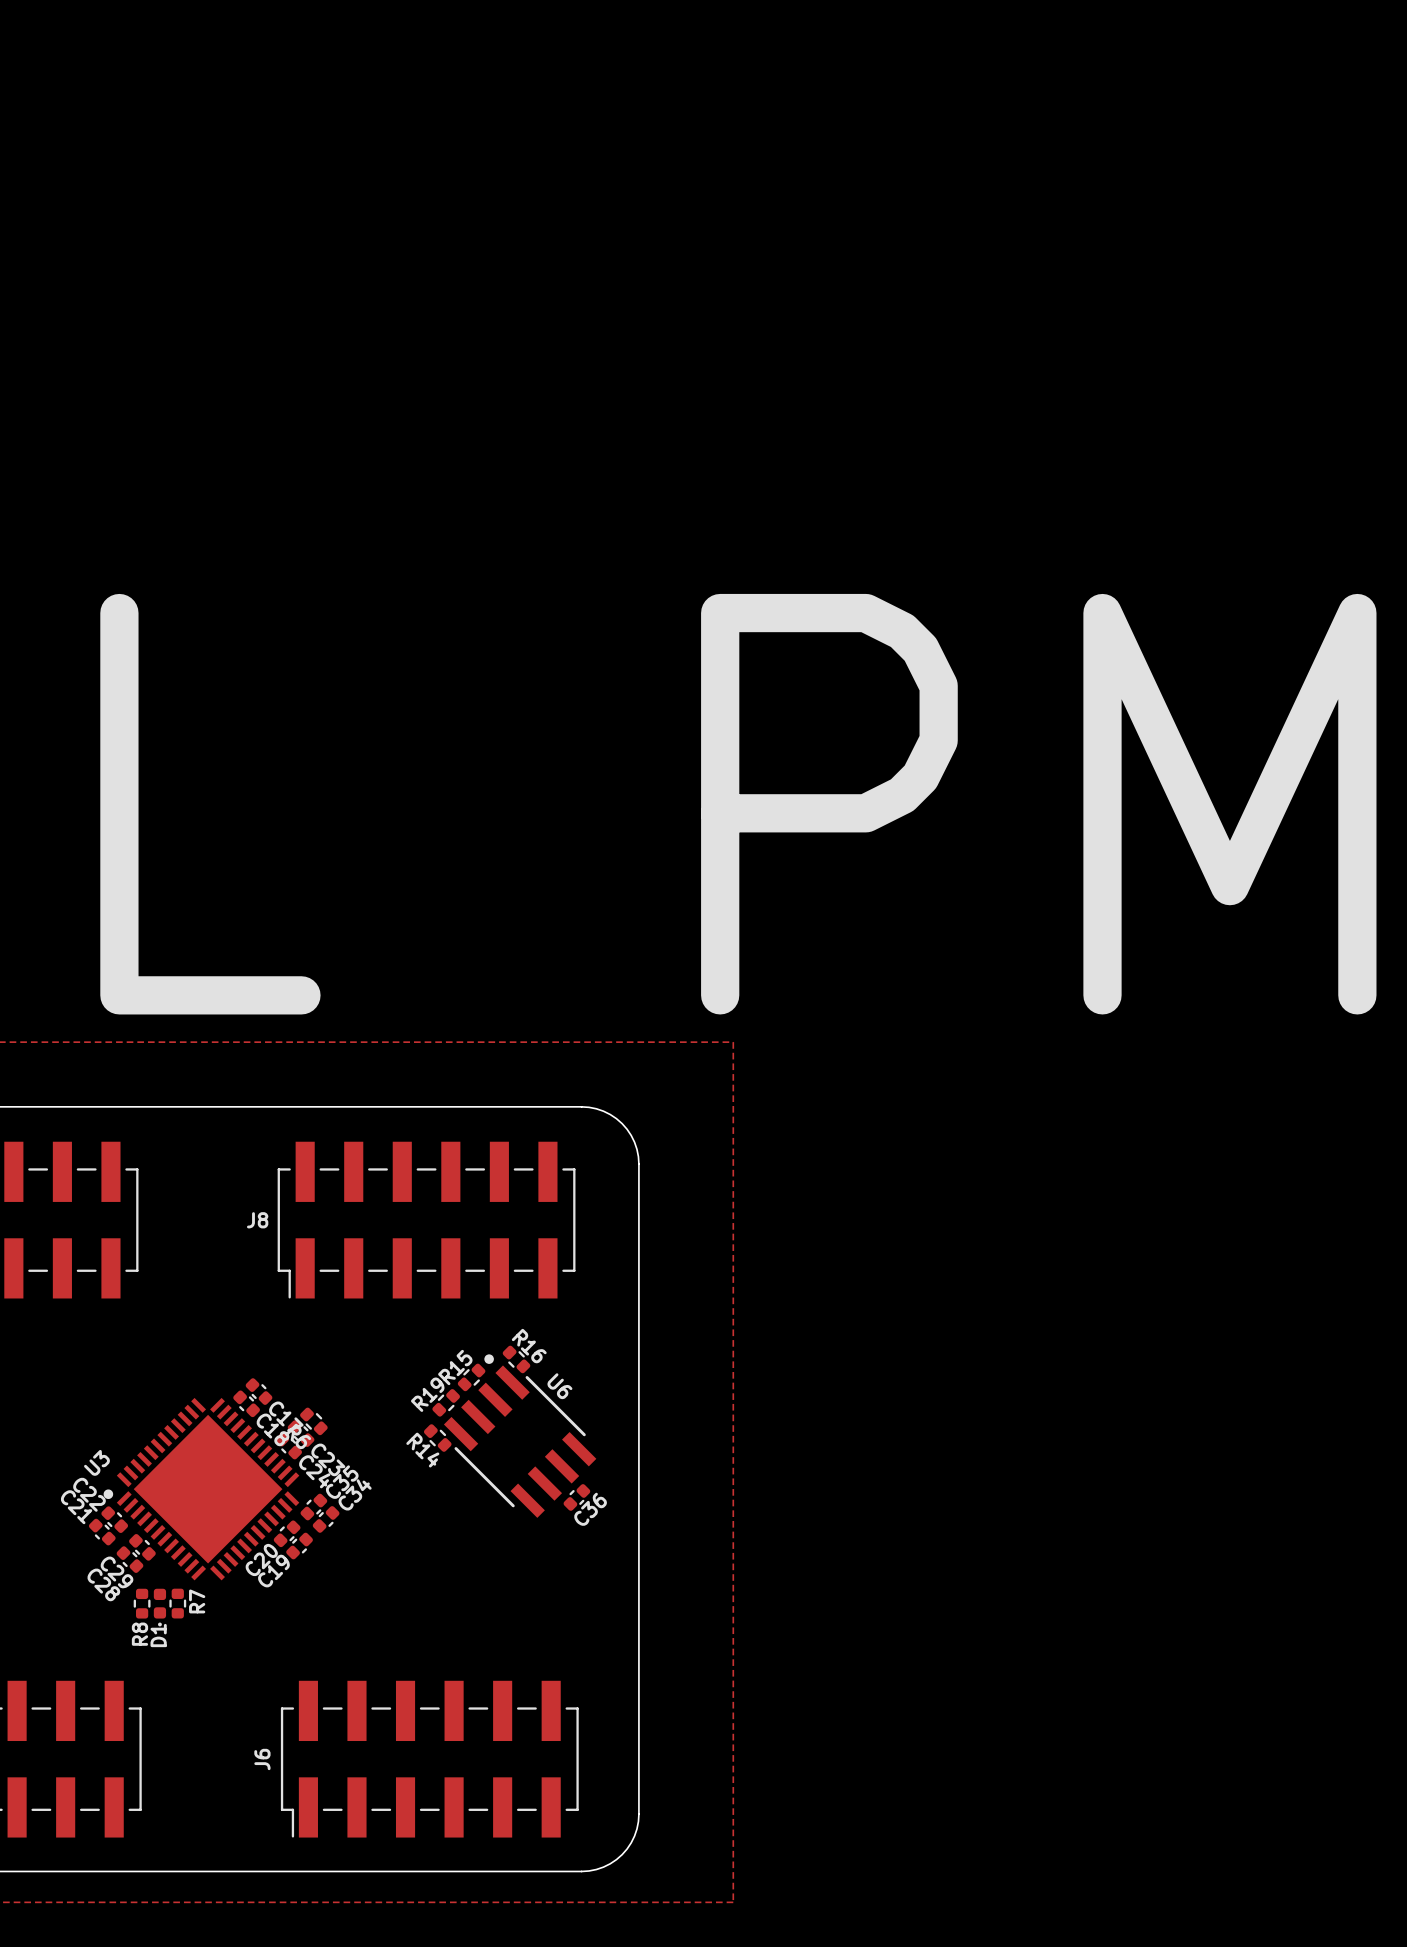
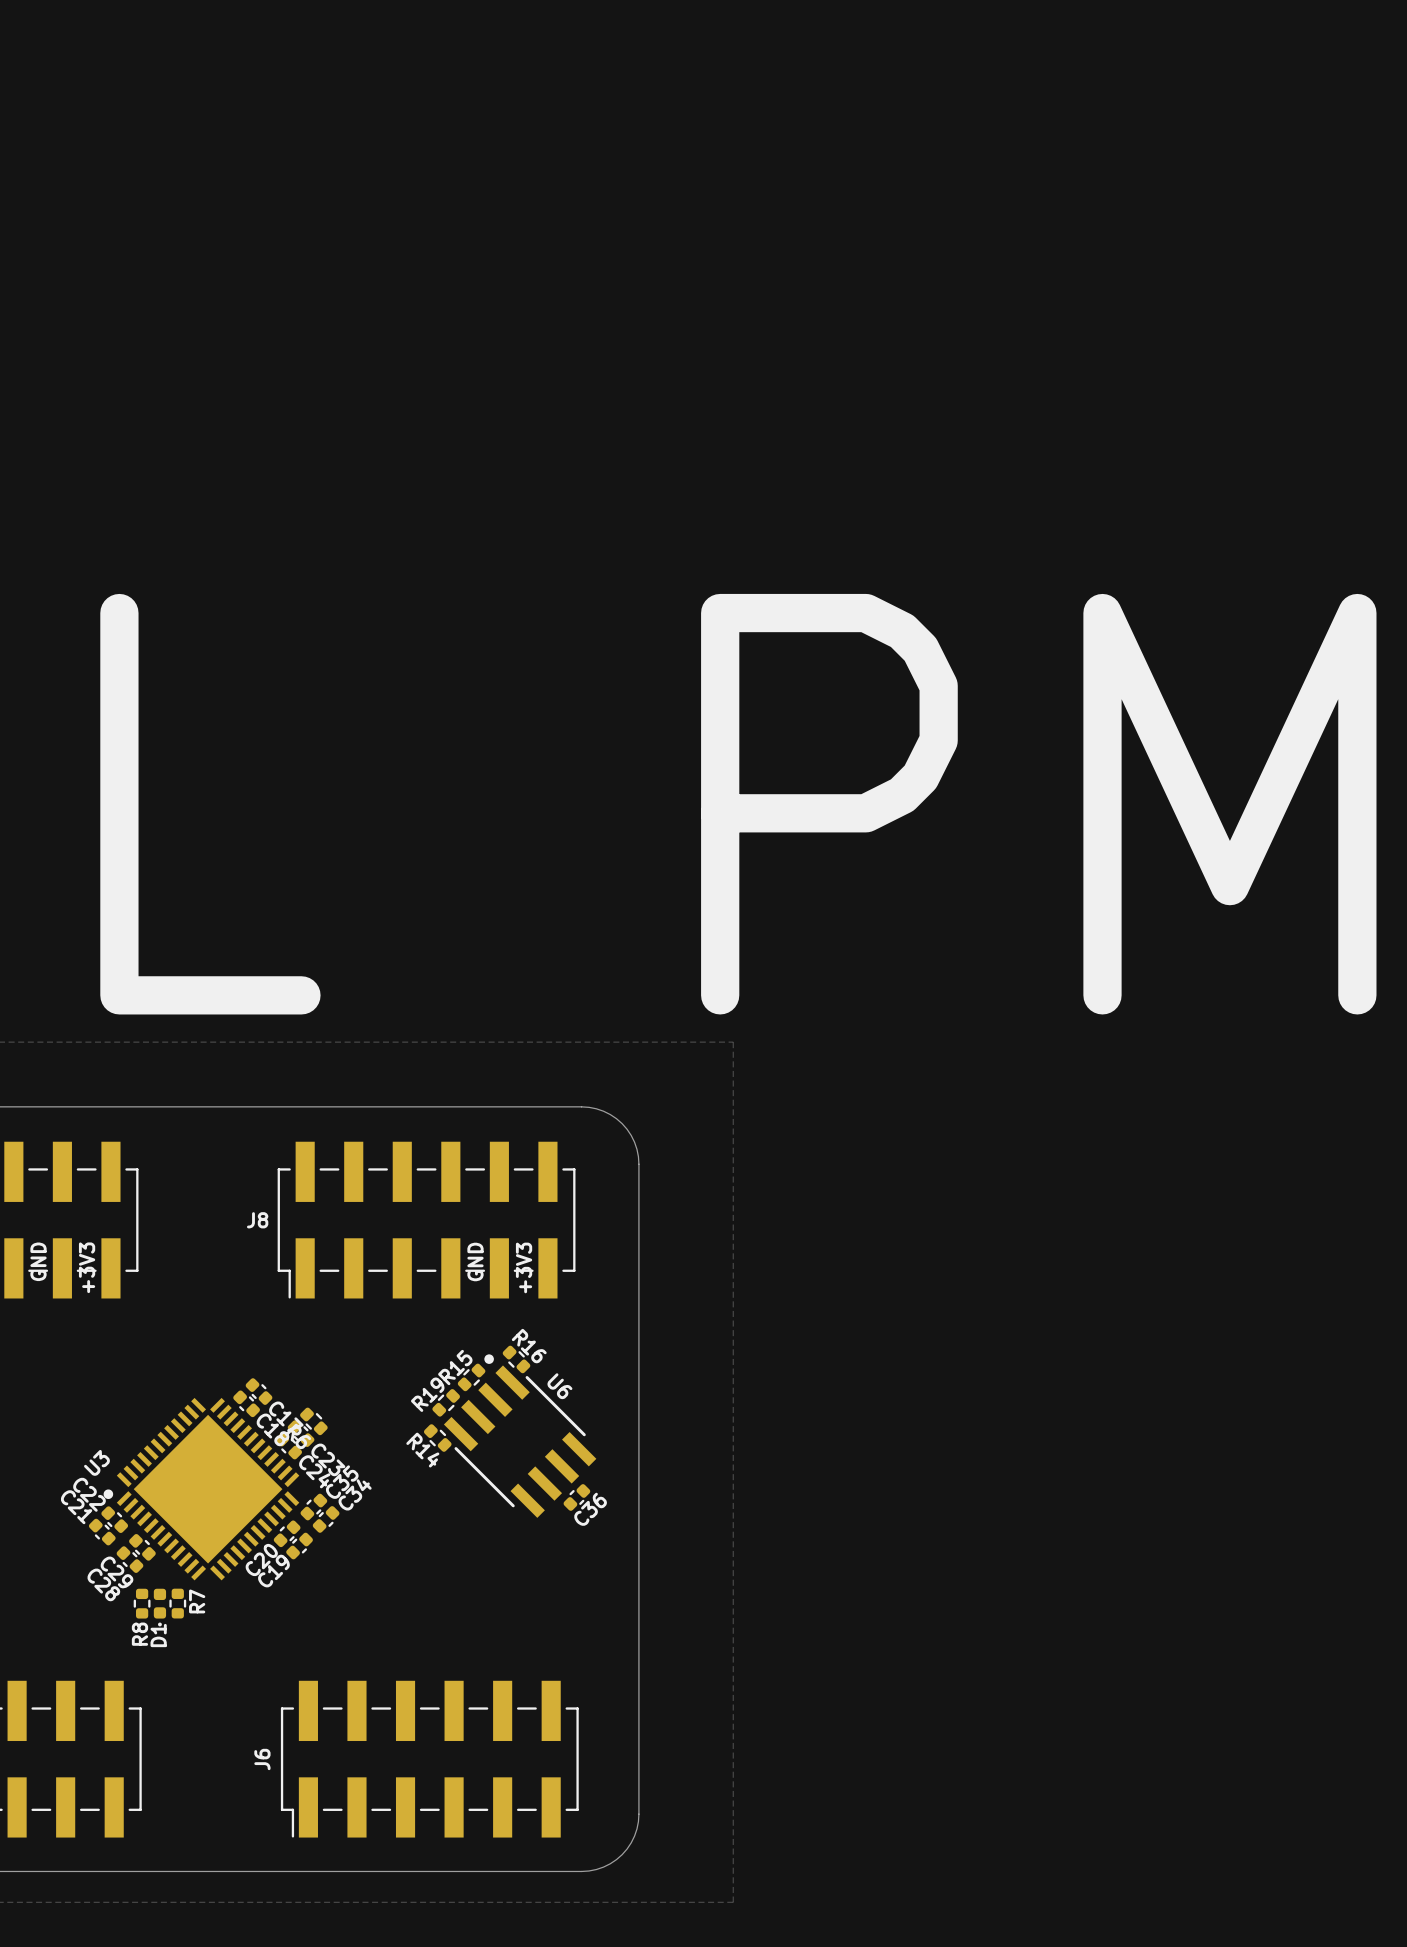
text: none -> GND (38, 1261)
text: none -> GND (475, 1261)
text: none -> +3V3 (87, 1267)
text: none -> +3V3 (524, 1267)

